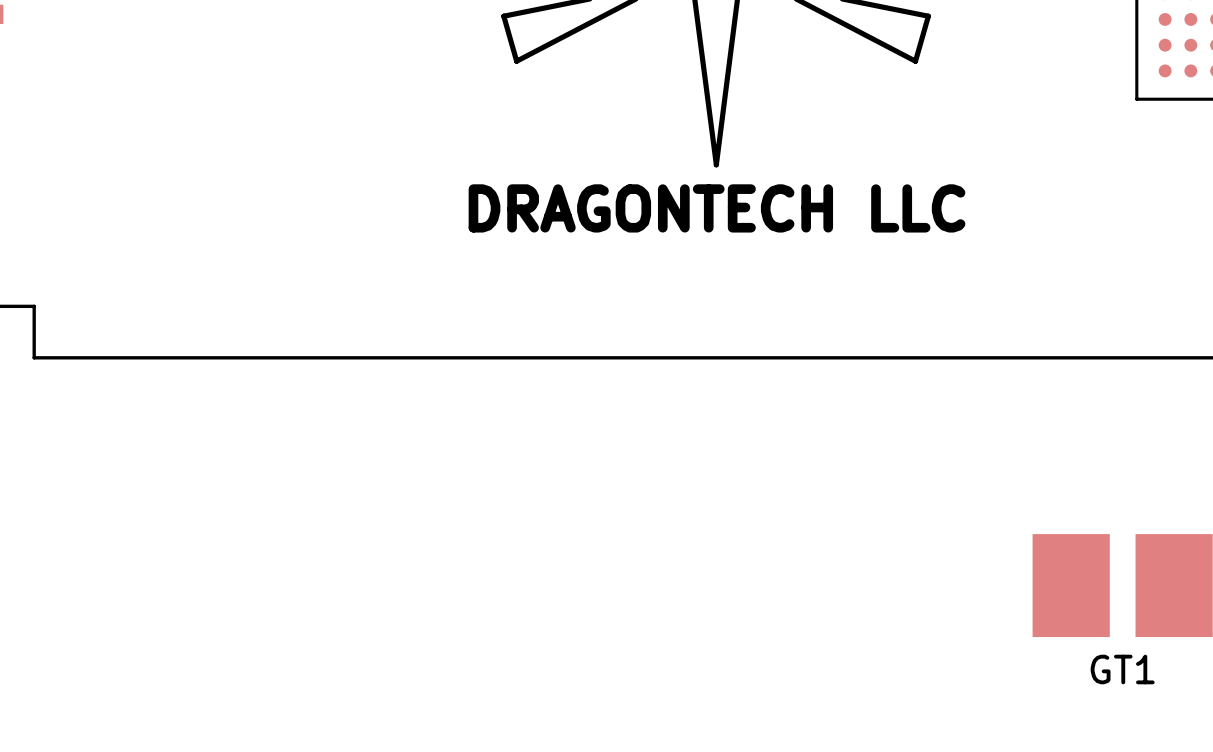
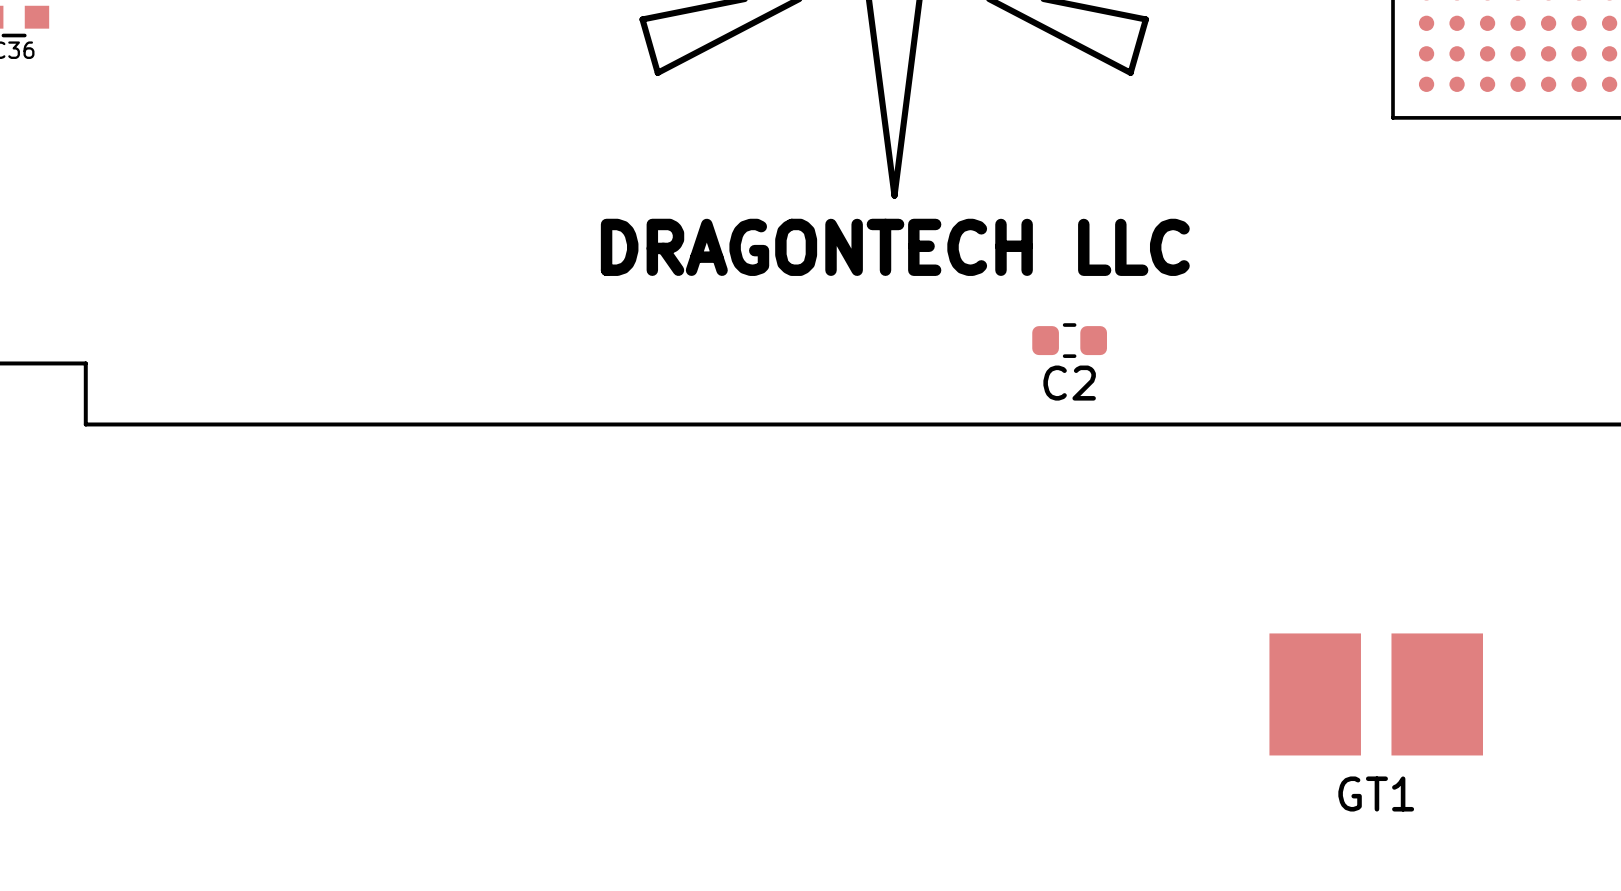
C2: none -> (1069, 340)

